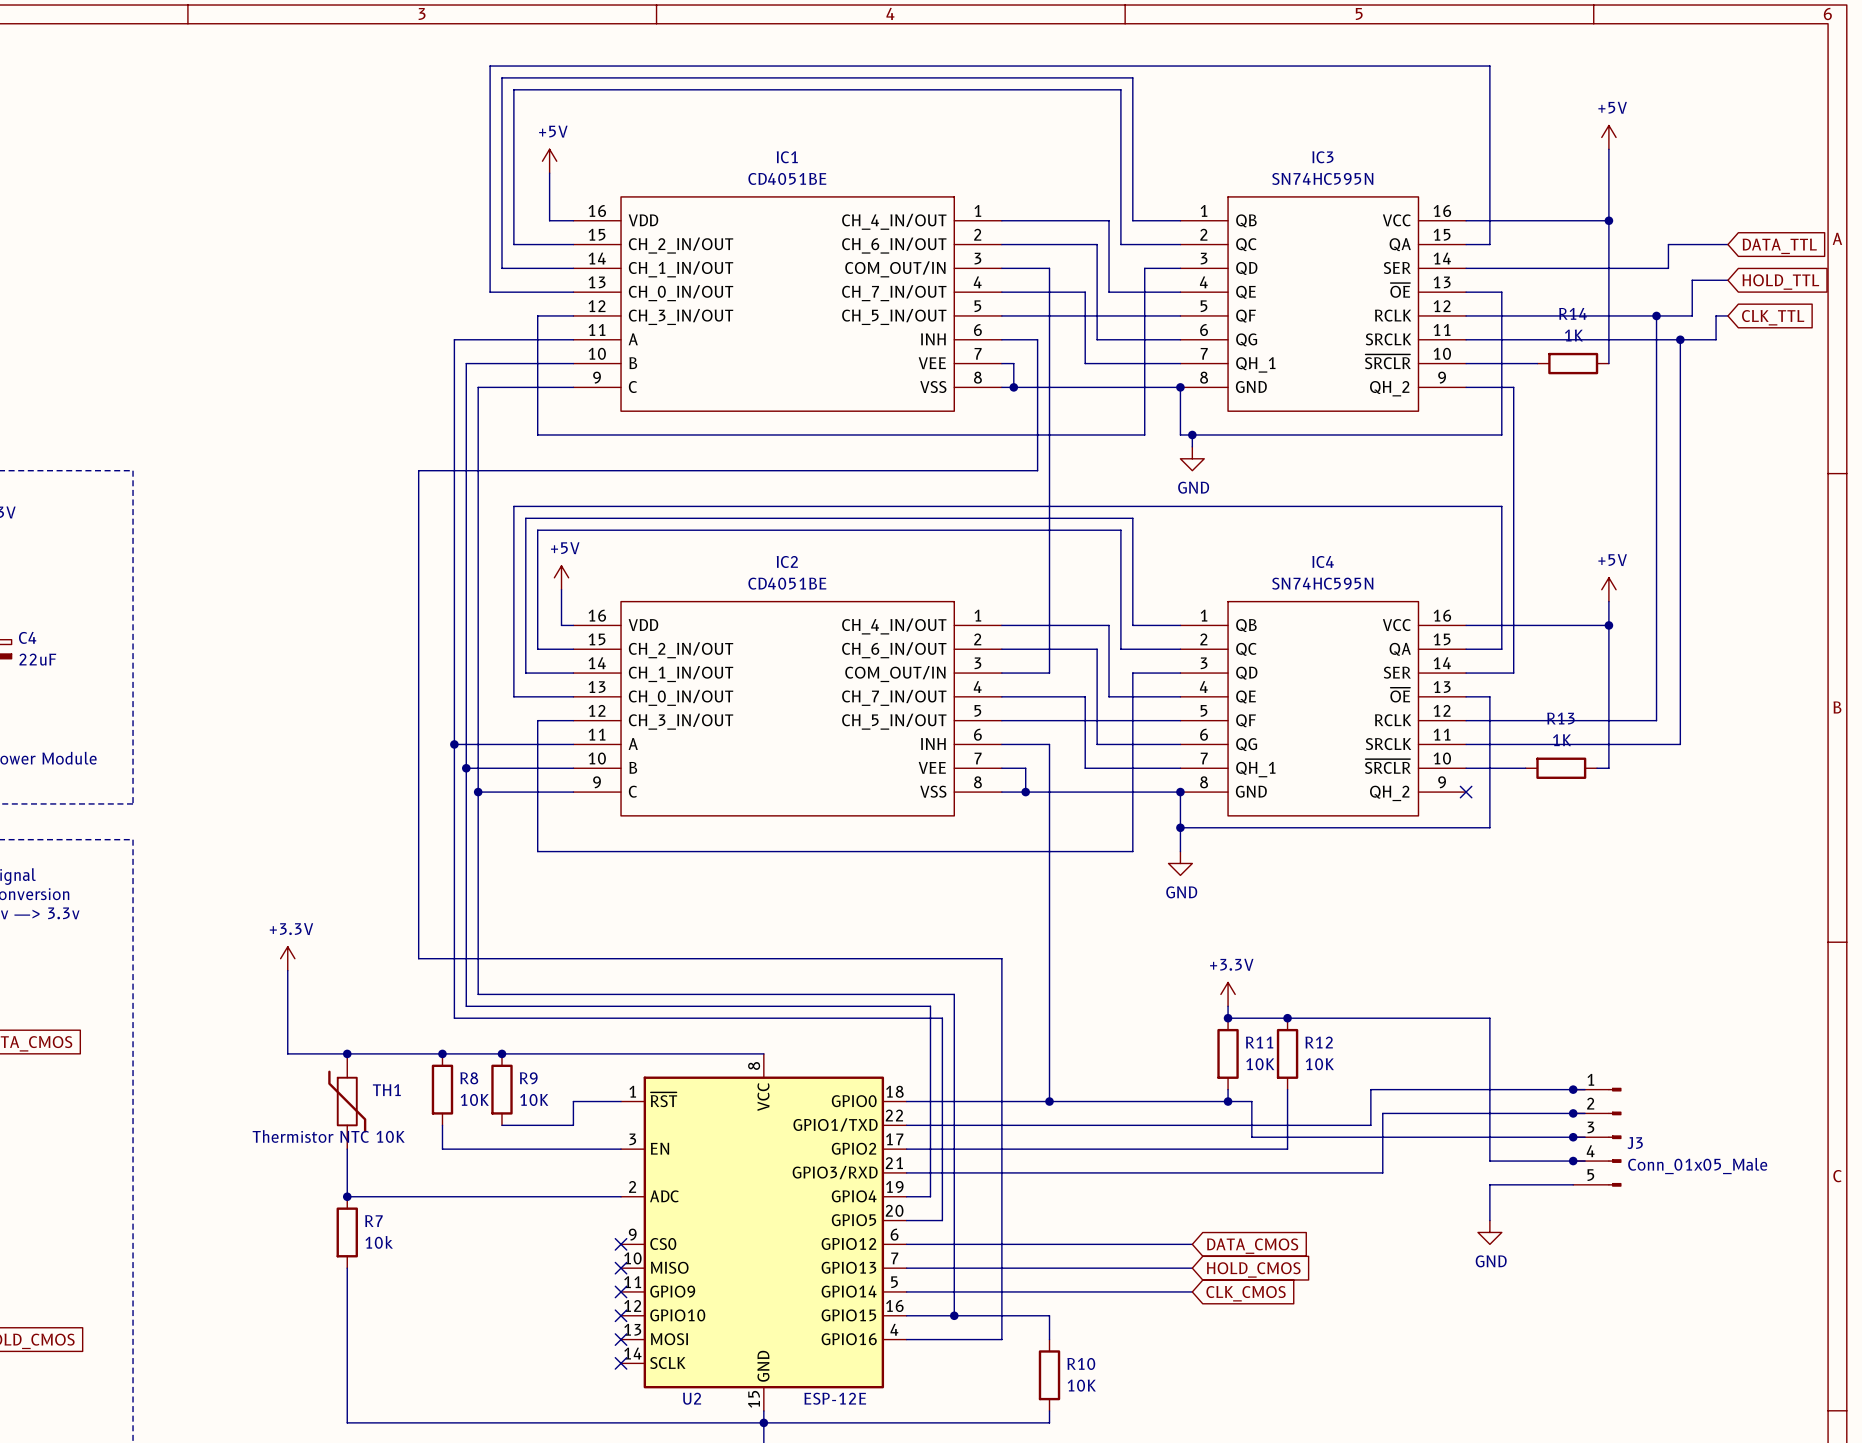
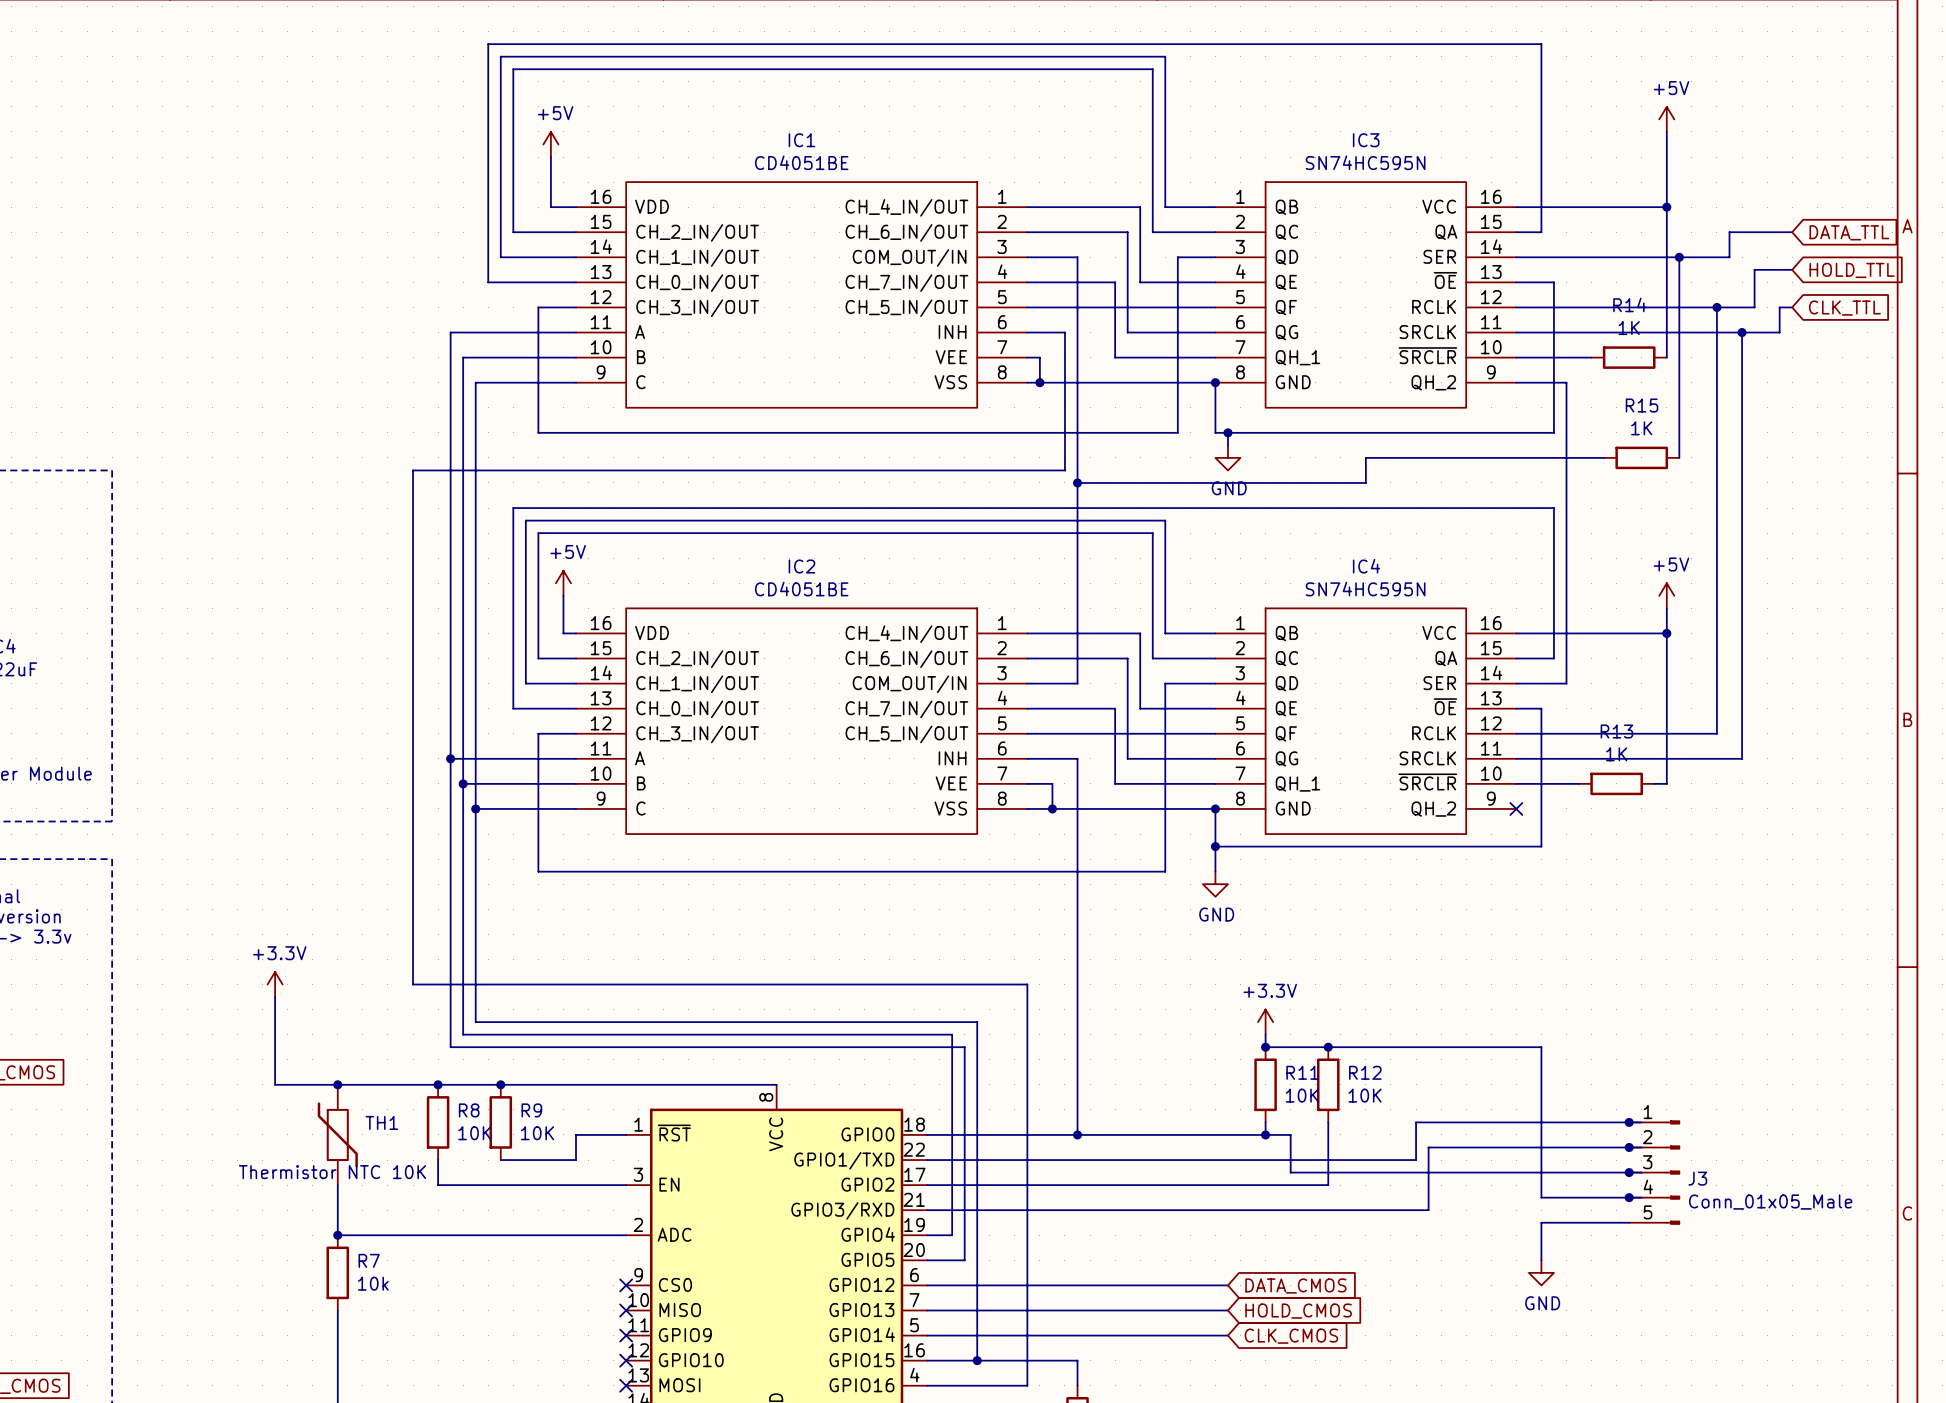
wire: none -> (1679, 257) (1679, 457)
junction: none -> (1679, 257)
wire: none -> (1604, 457) (1365, 457) (1365, 482) (1077, 482)
R15: none -> 1K (1641, 457)
junction: none -> (1077, 482)

